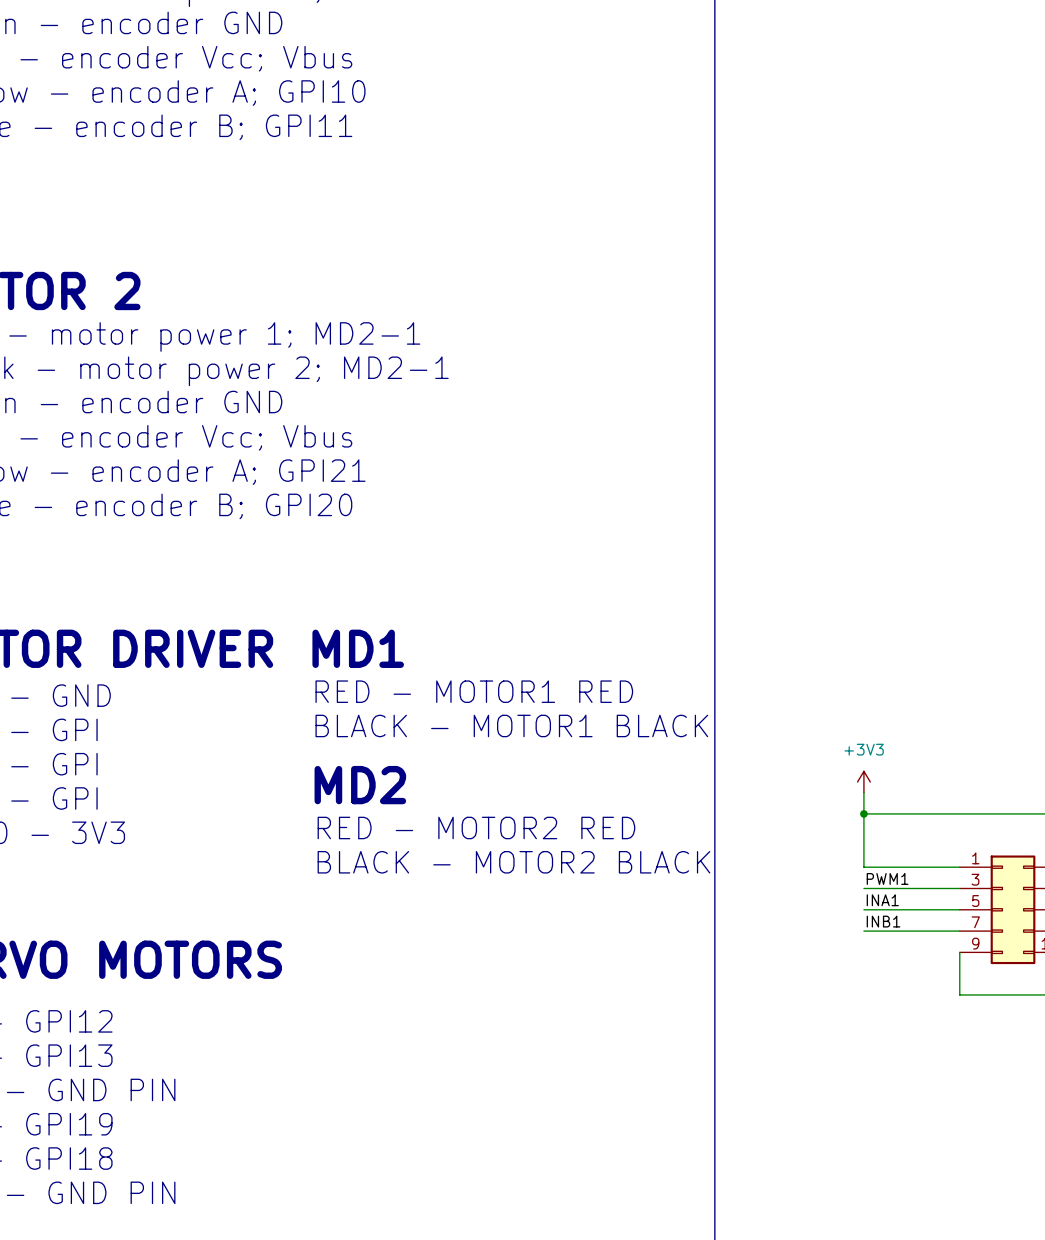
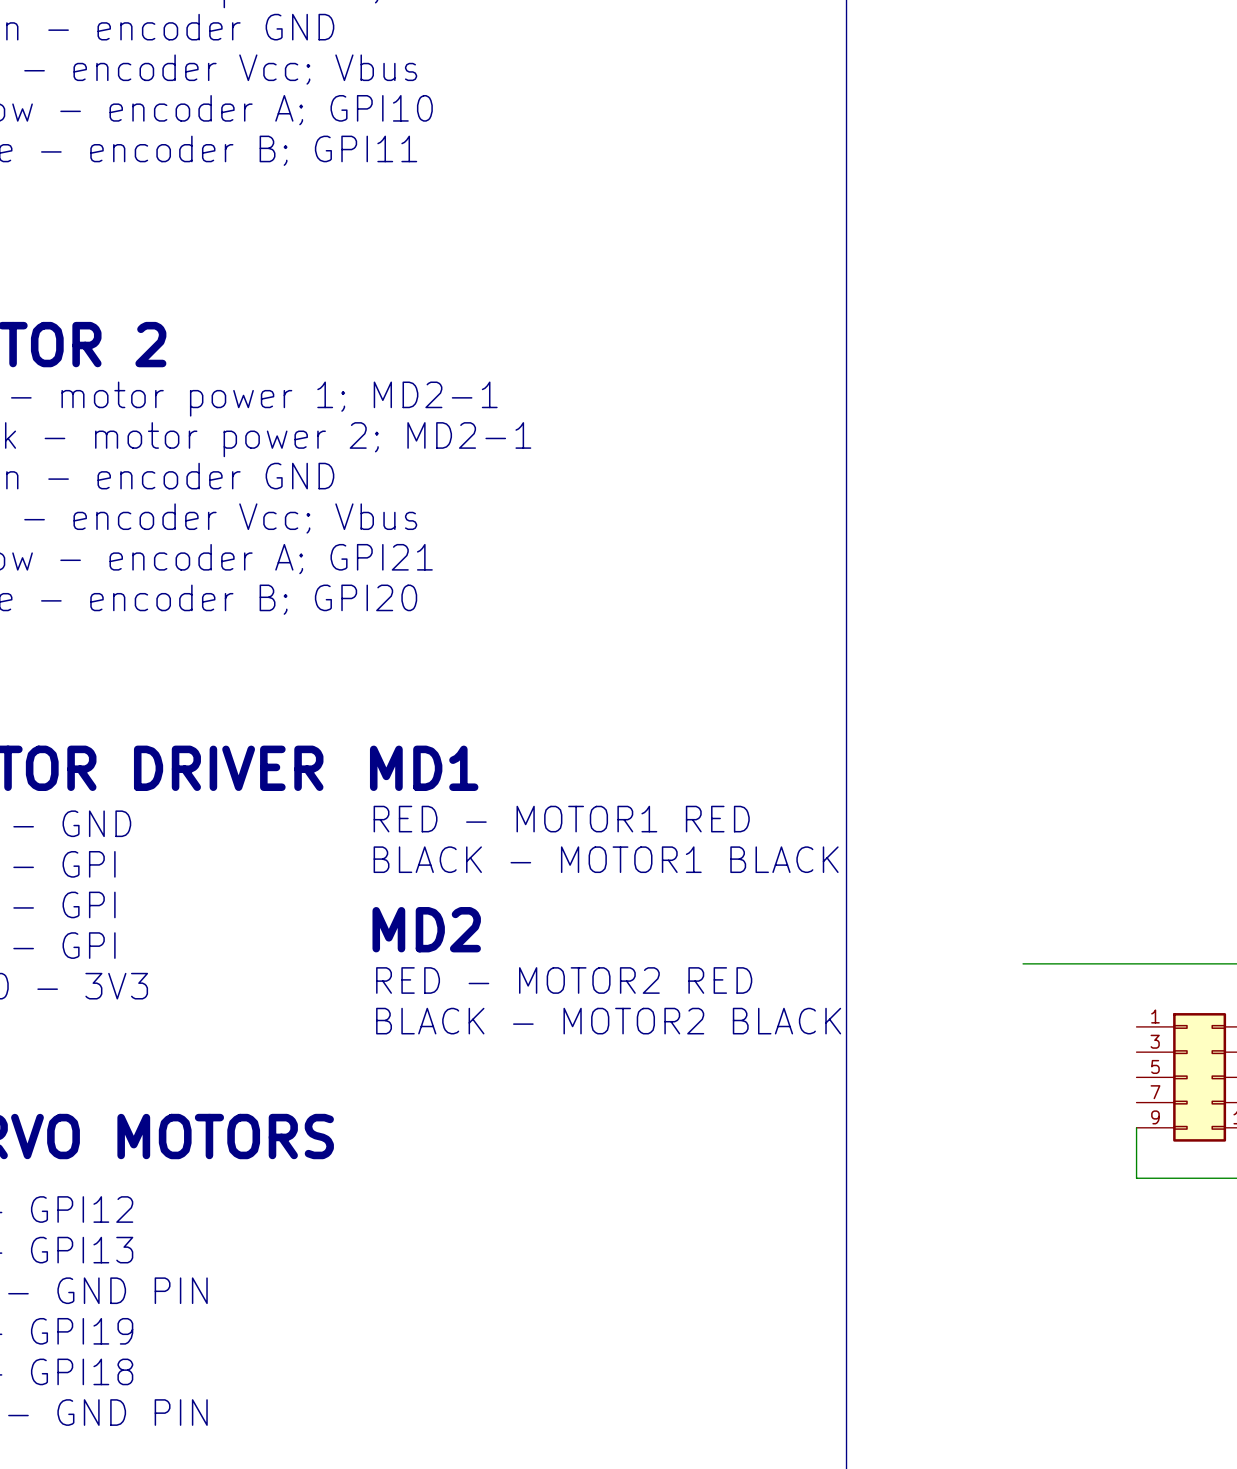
power symbol: +3V3 (863, 782) -> none
wire: (863, 792) (863, 867) (959, 867) -> none
junction: (863, 813) -> none
label: PWM1 (887, 878) -> none
wire: (863, 888) (959, 888) -> none
label: INA1 (882, 900) -> none
wire: (863, 909) (959, 909) -> none
label: INB1 (883, 921) -> none
wire: (863, 931) (959, 931) -> none

